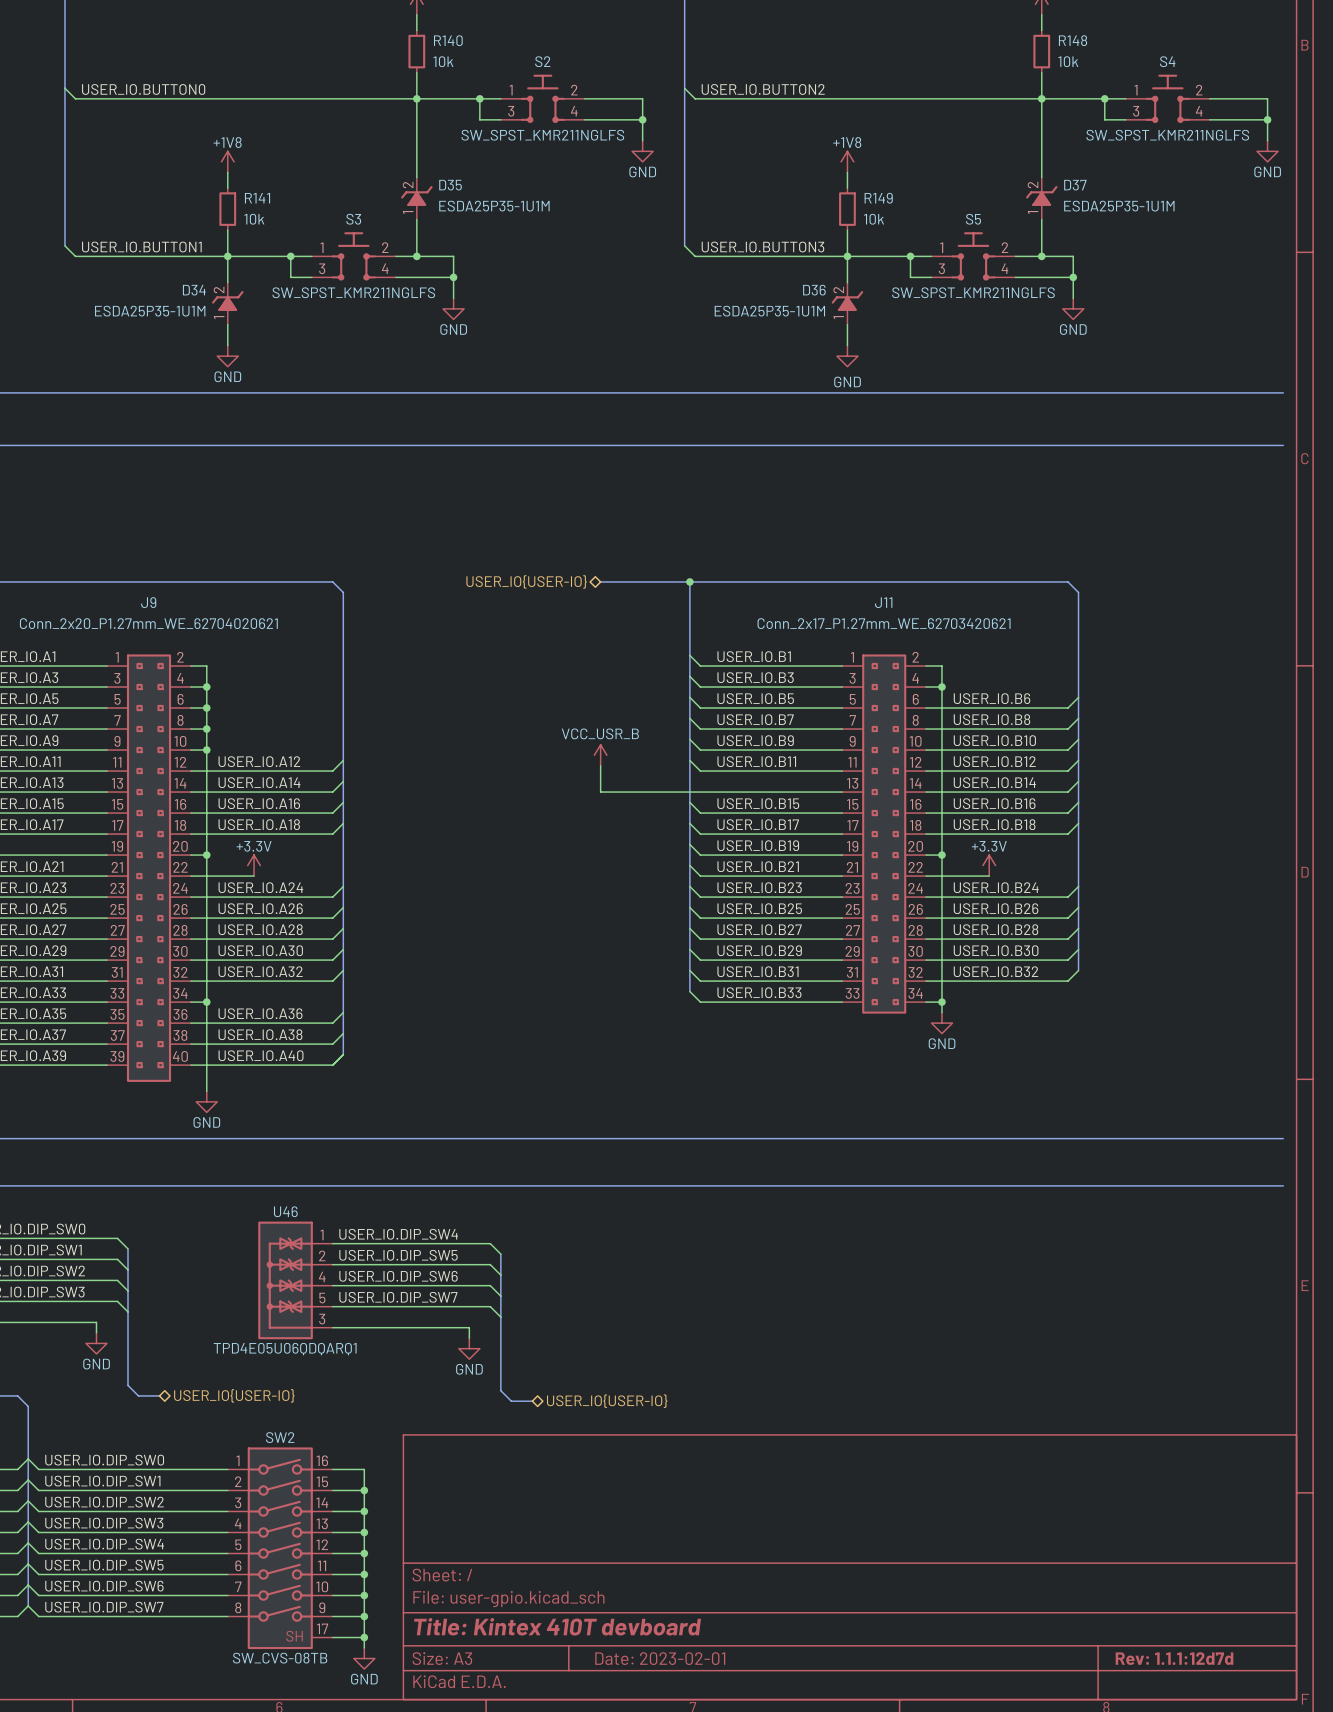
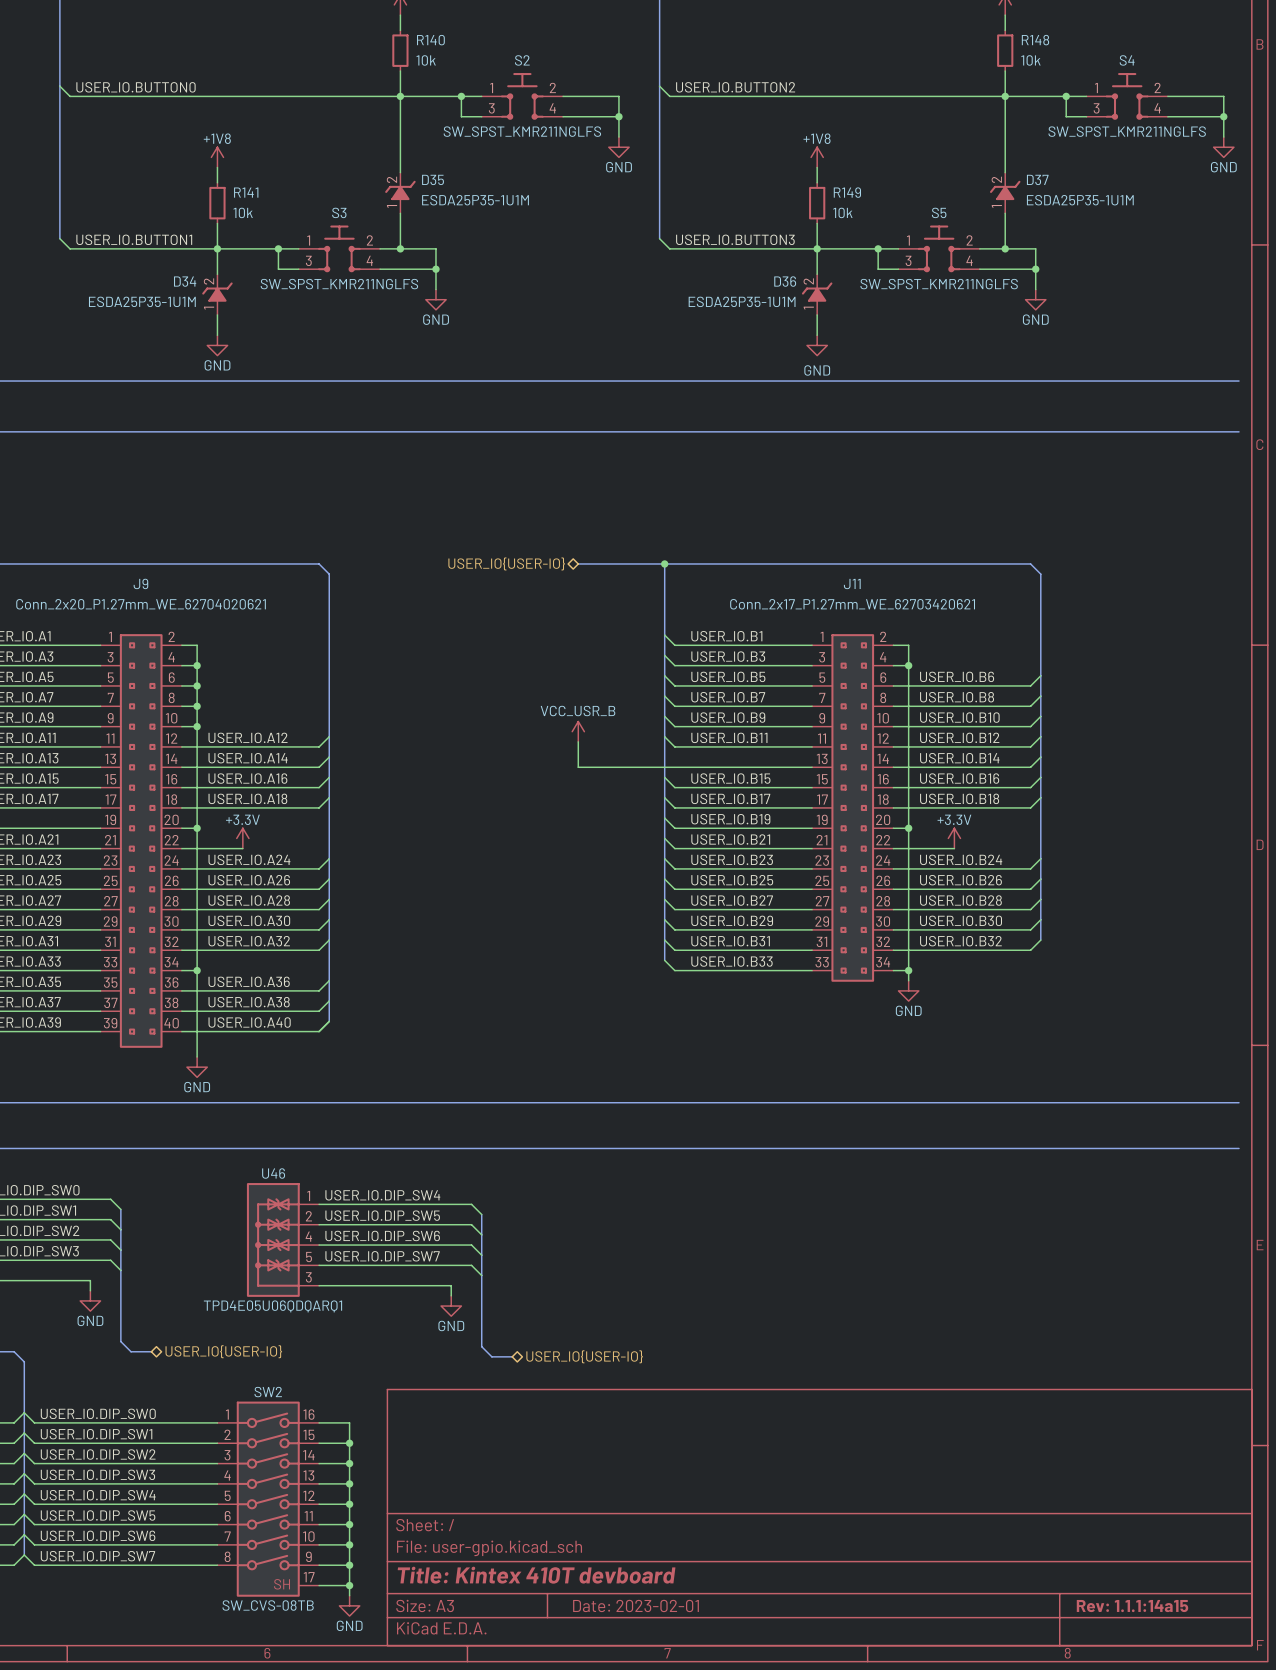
title block: Rev: 1.1.1:12d7d (1174, 1658) -> Rev: 1.1.1:14a15 (1132, 1606)

